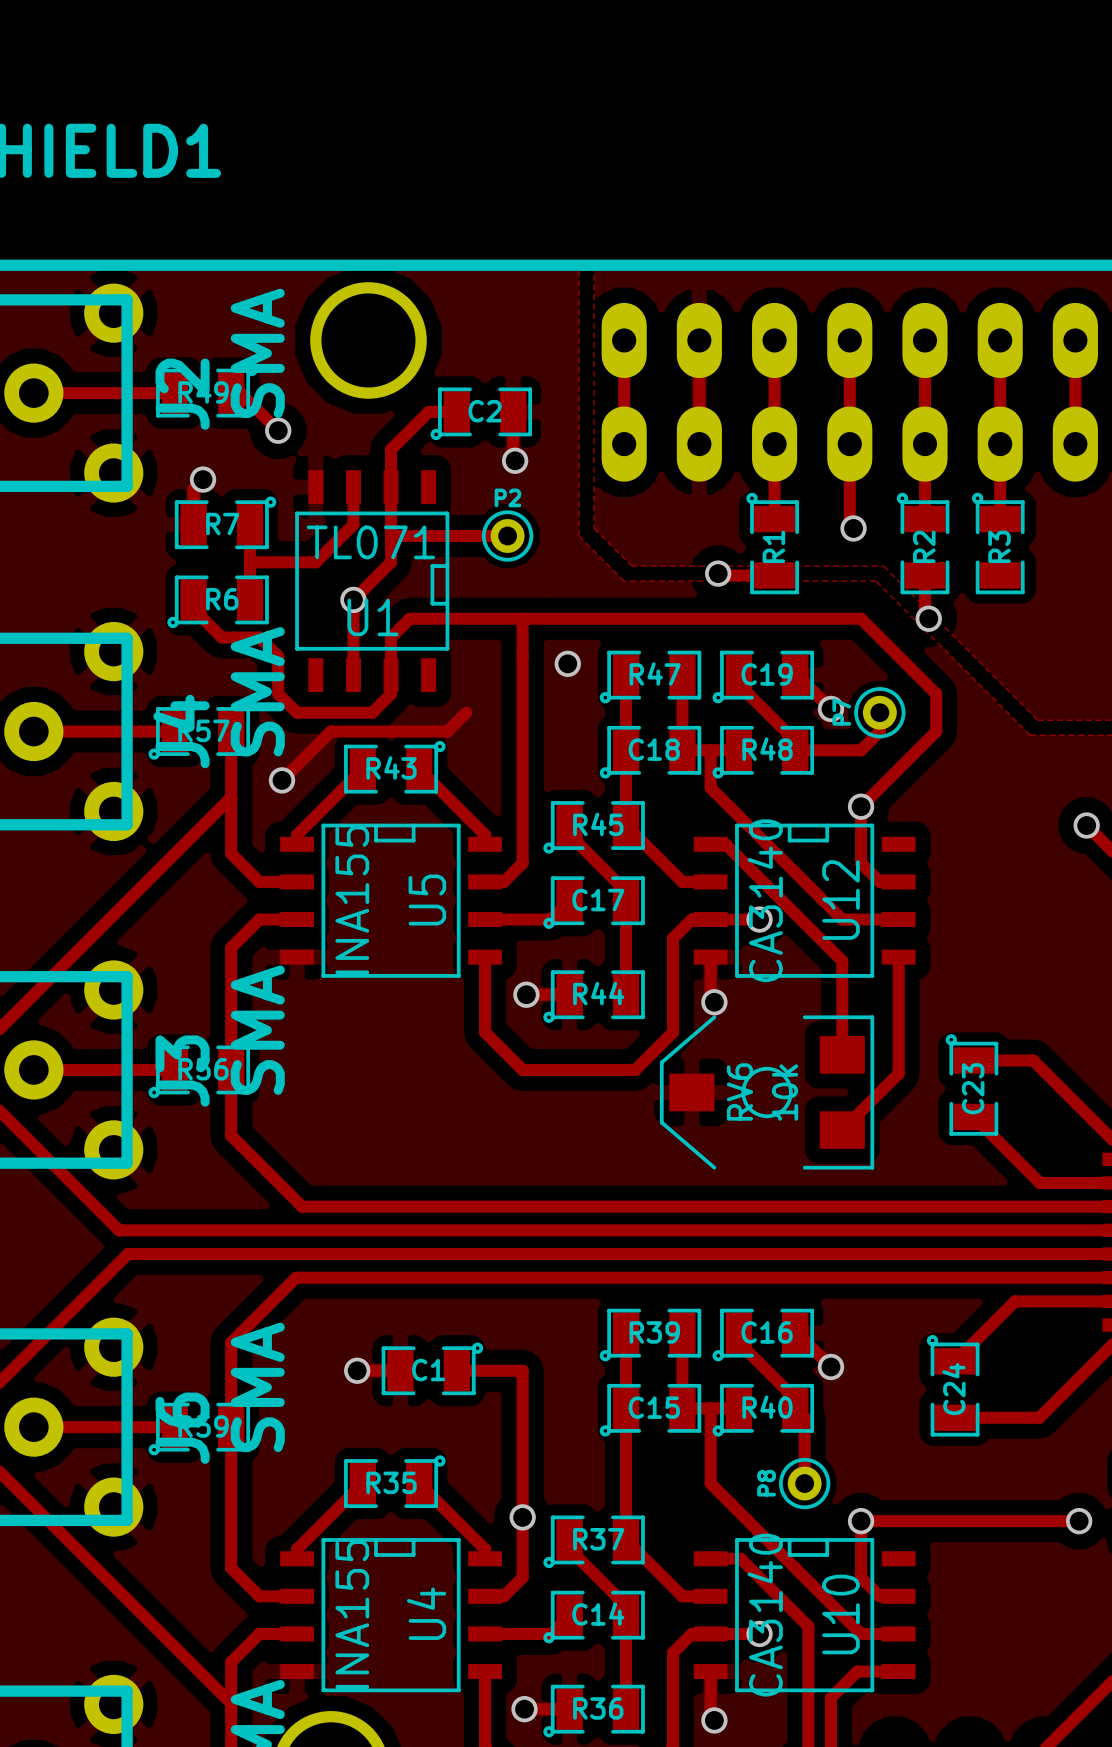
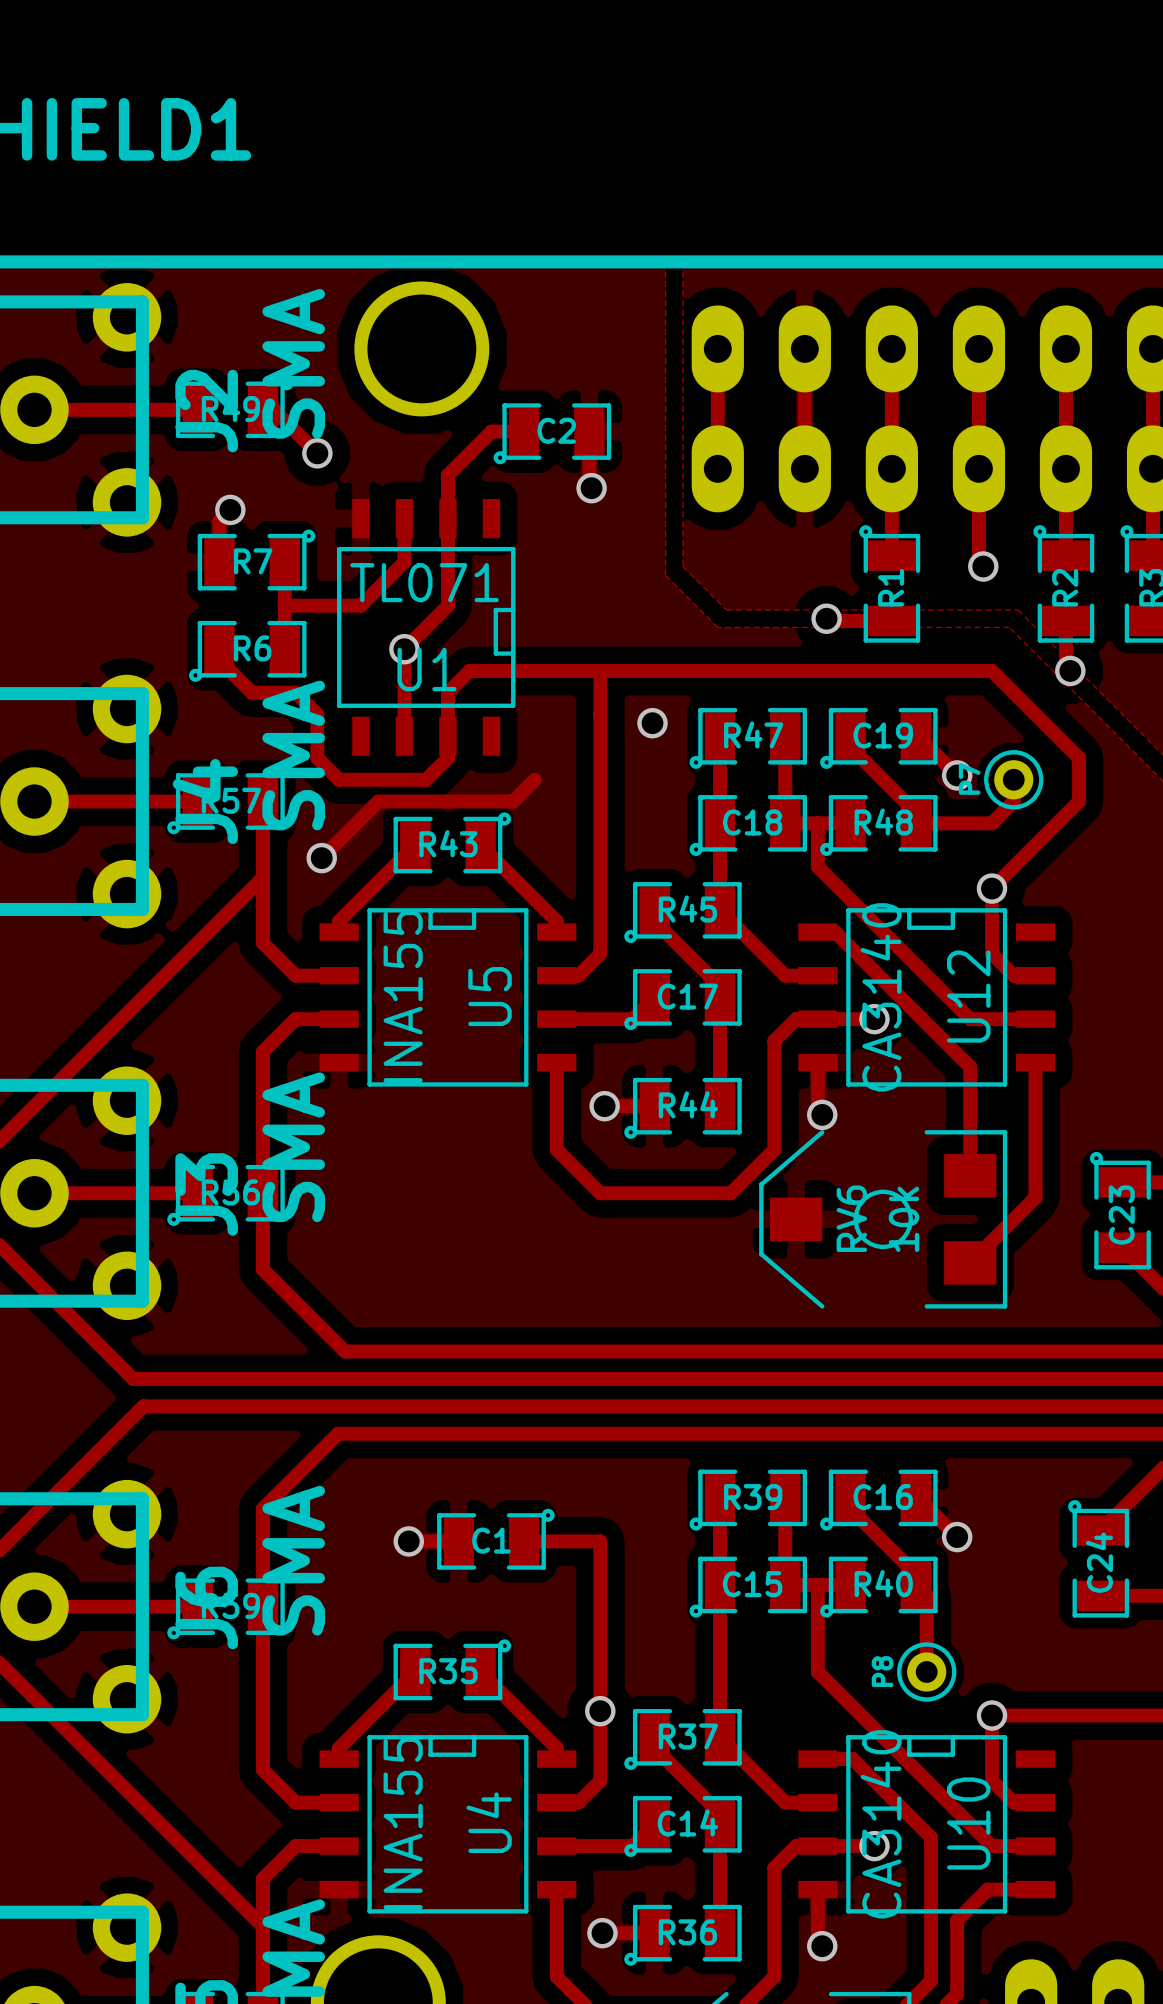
track: (391, 535) (507, 535) -> none
P2: (507, 535) -> none

